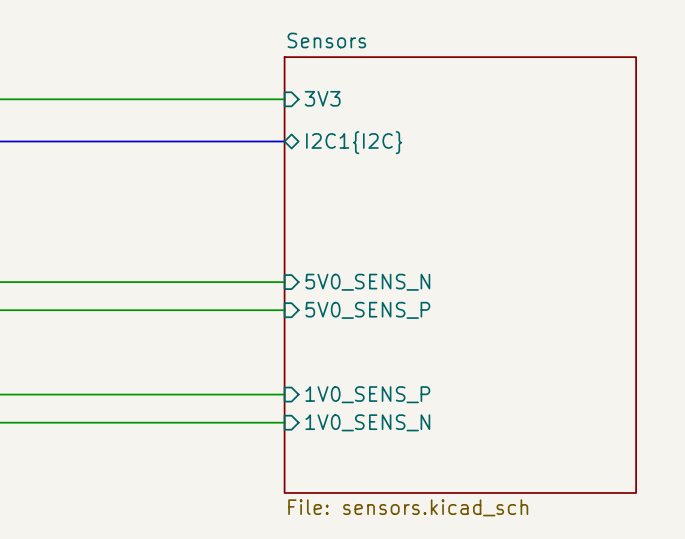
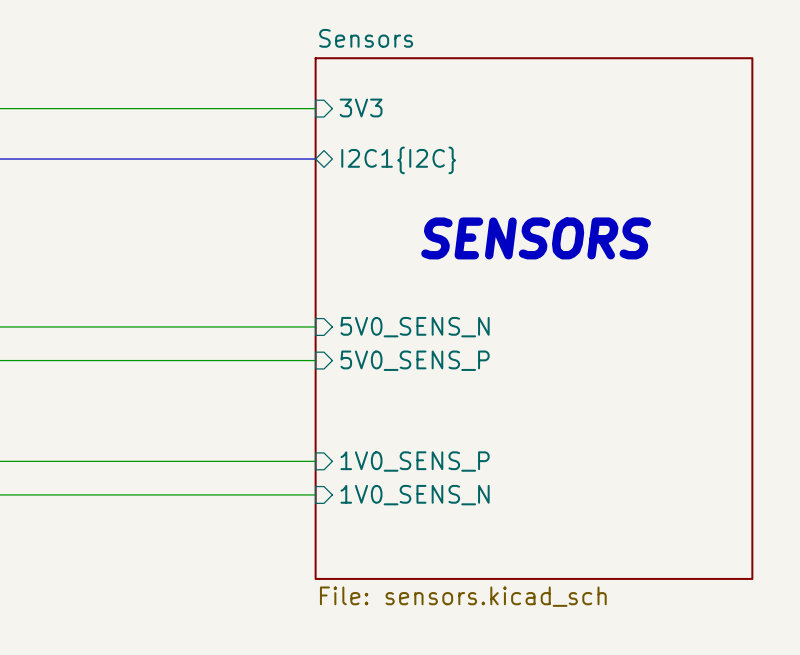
sheet Sensors shape: [283, 56, 637, 494] -> [314, 57, 754, 580]
text: none -> SENSORS (536, 238)

